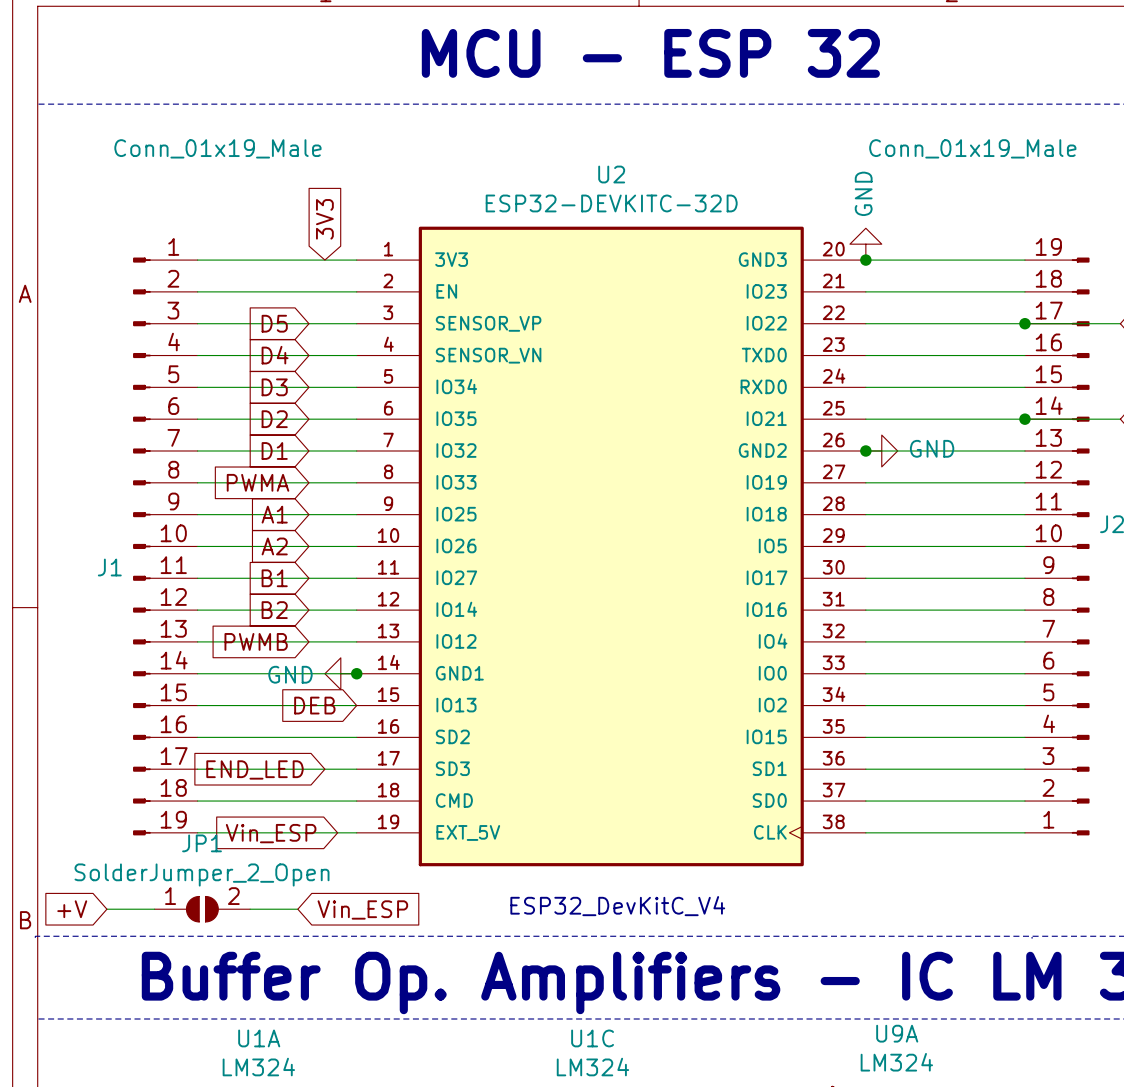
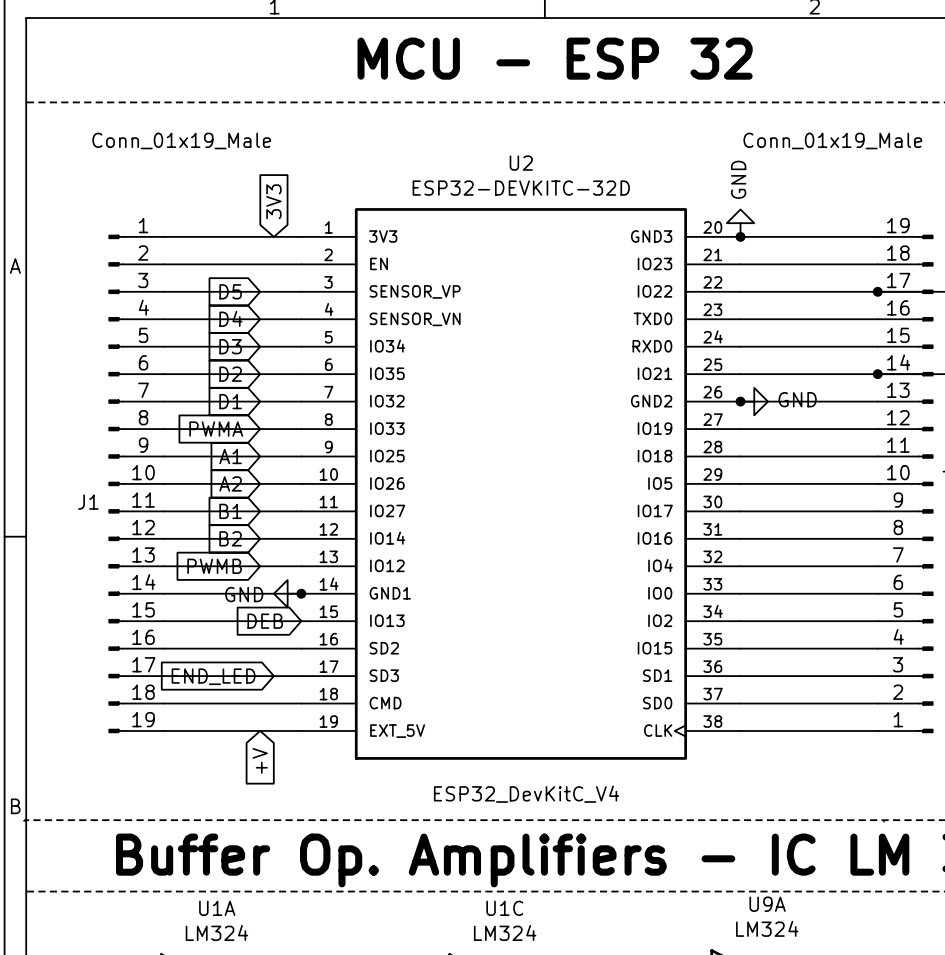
global label: Vin_ESP (271, 833) -> none
global label rotation: 0° (72, 909) -> 90° counterclockwise (260, 760)
global label position: +V (72, 909) -> +V (260, 760)
wire: (106, 909) (154, 909) -> none
JP1: SolderJumper_2_Open (202, 909) -> none
wire: (250, 909) (297, 909) -> none
global label: Vin_ESP (362, 909) -> none

